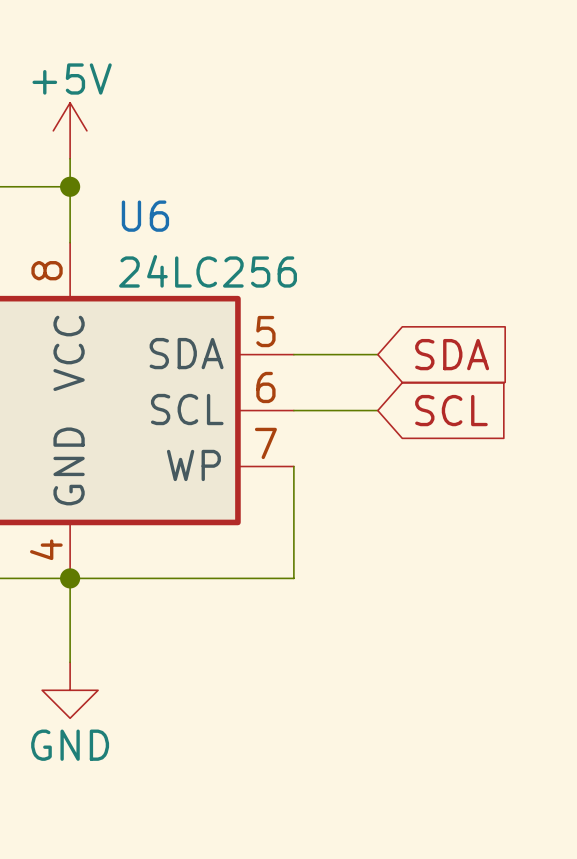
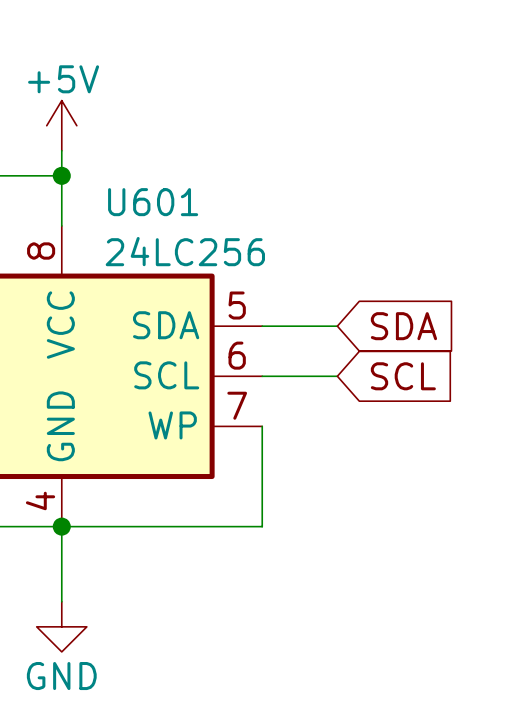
U6 name: U6 (145, 216) -> U601 (153, 202)

